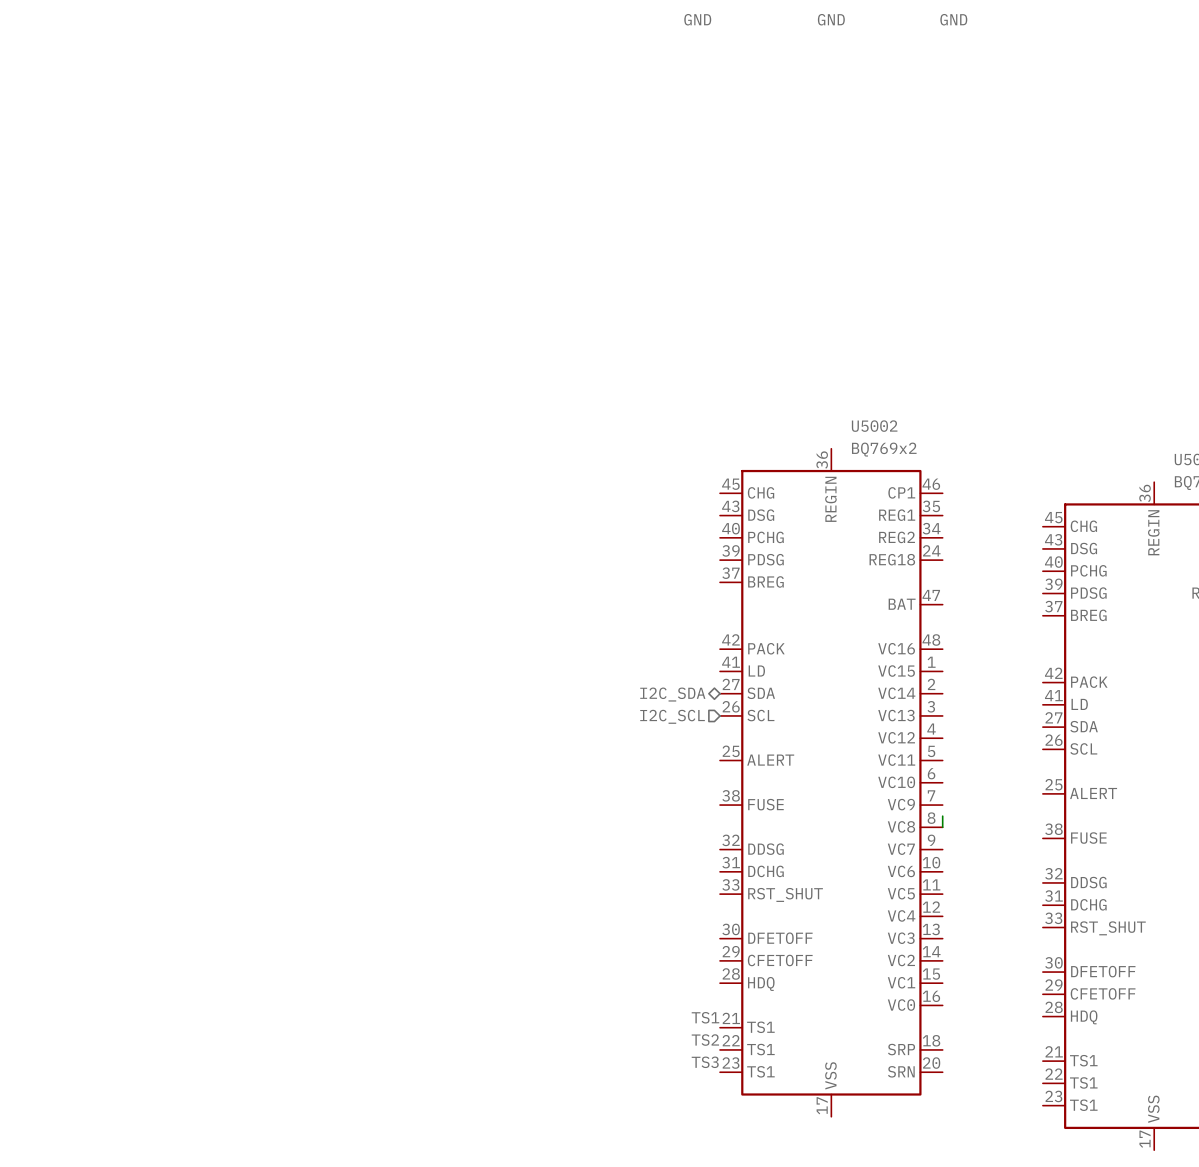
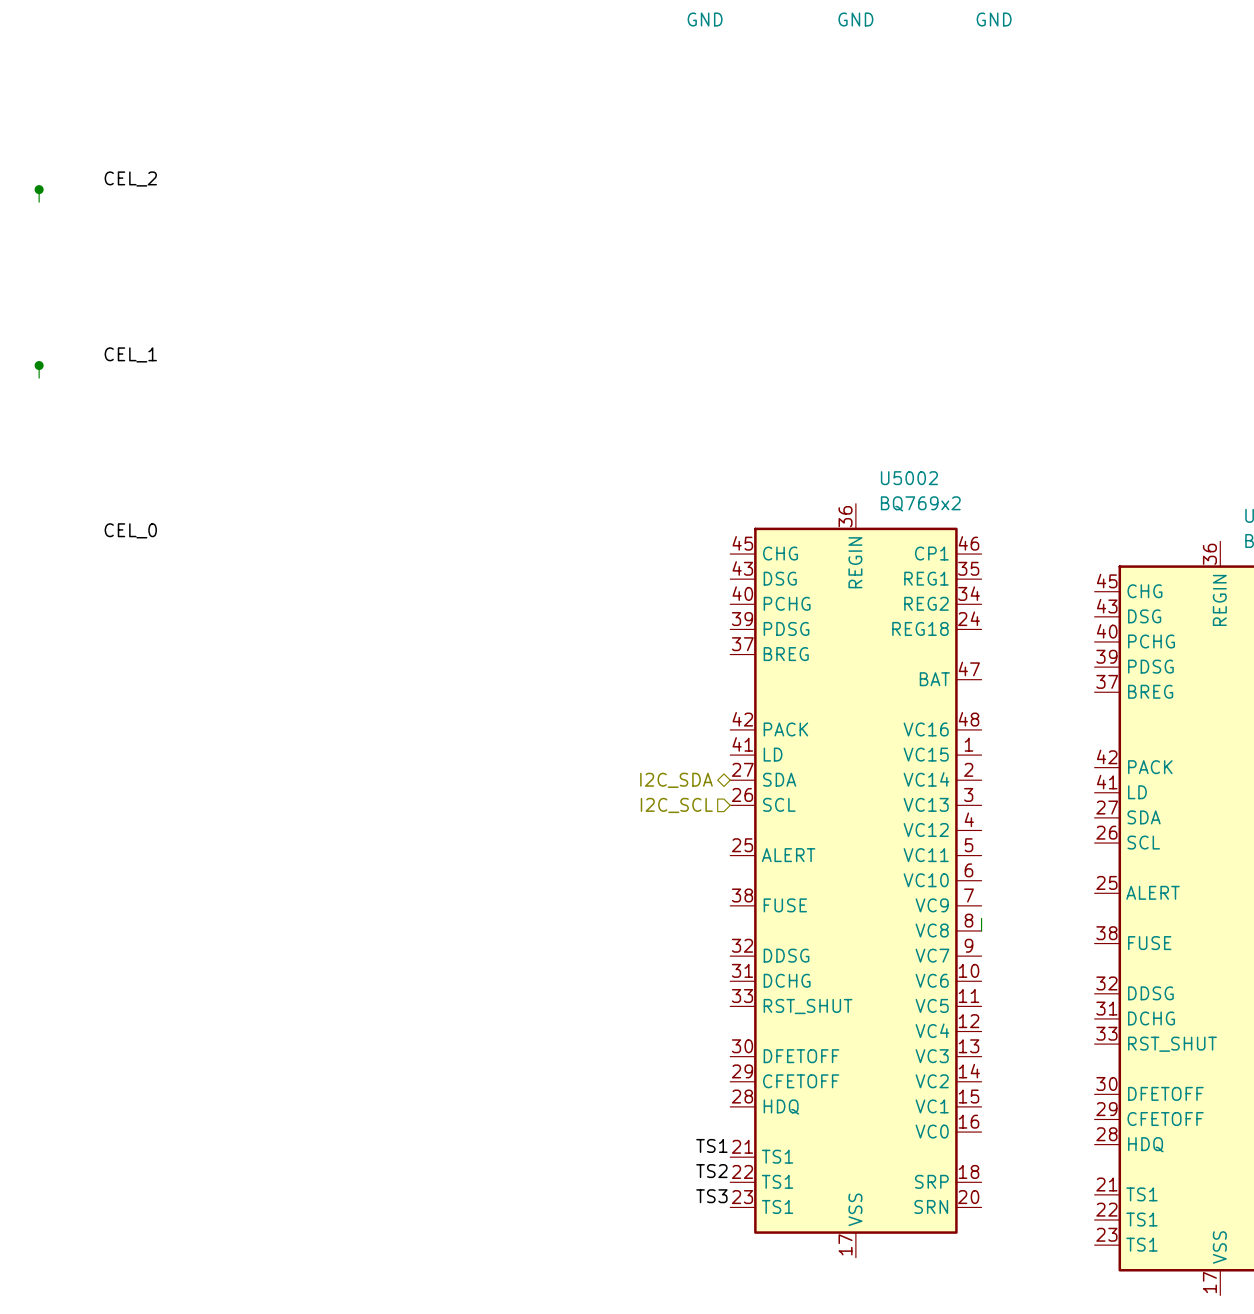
label: none -> CEL_2 (130, 179)
wire: none -> (39, 189) (39, 202)
junction: none -> (39, 189)
label: none -> CEL_1 (130, 354)
wire: none -> (39, 365) (39, 378)
junction: none -> (39, 365)
label: none -> CEL_0 (130, 530)

